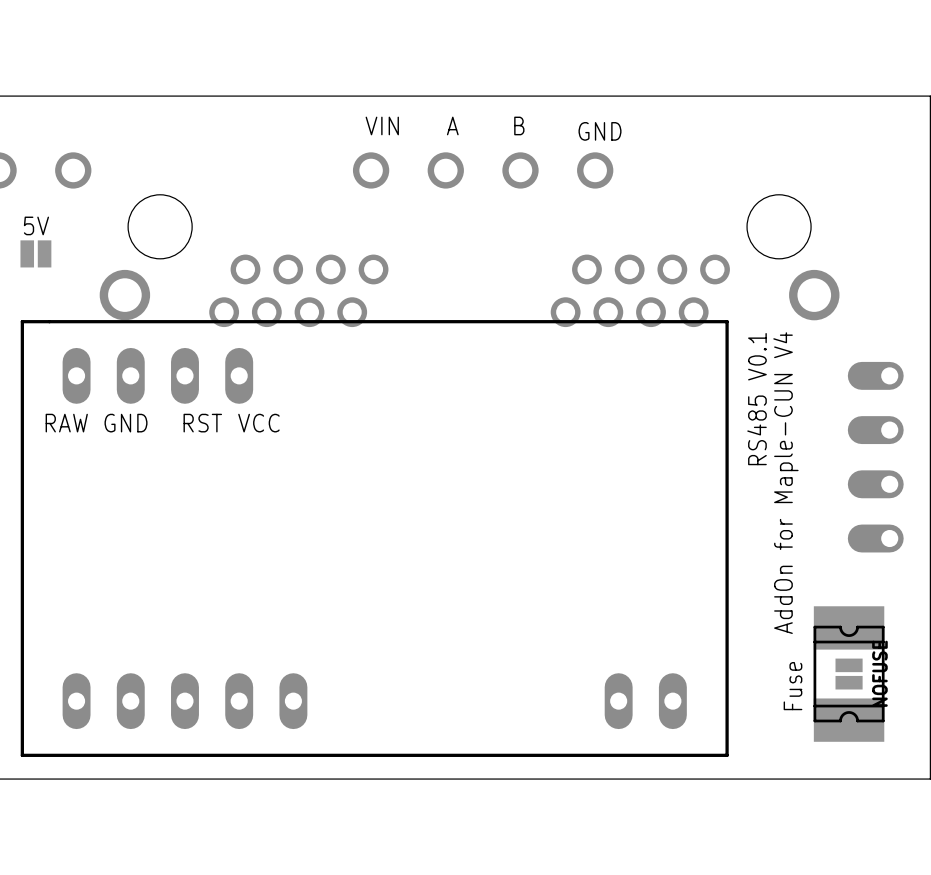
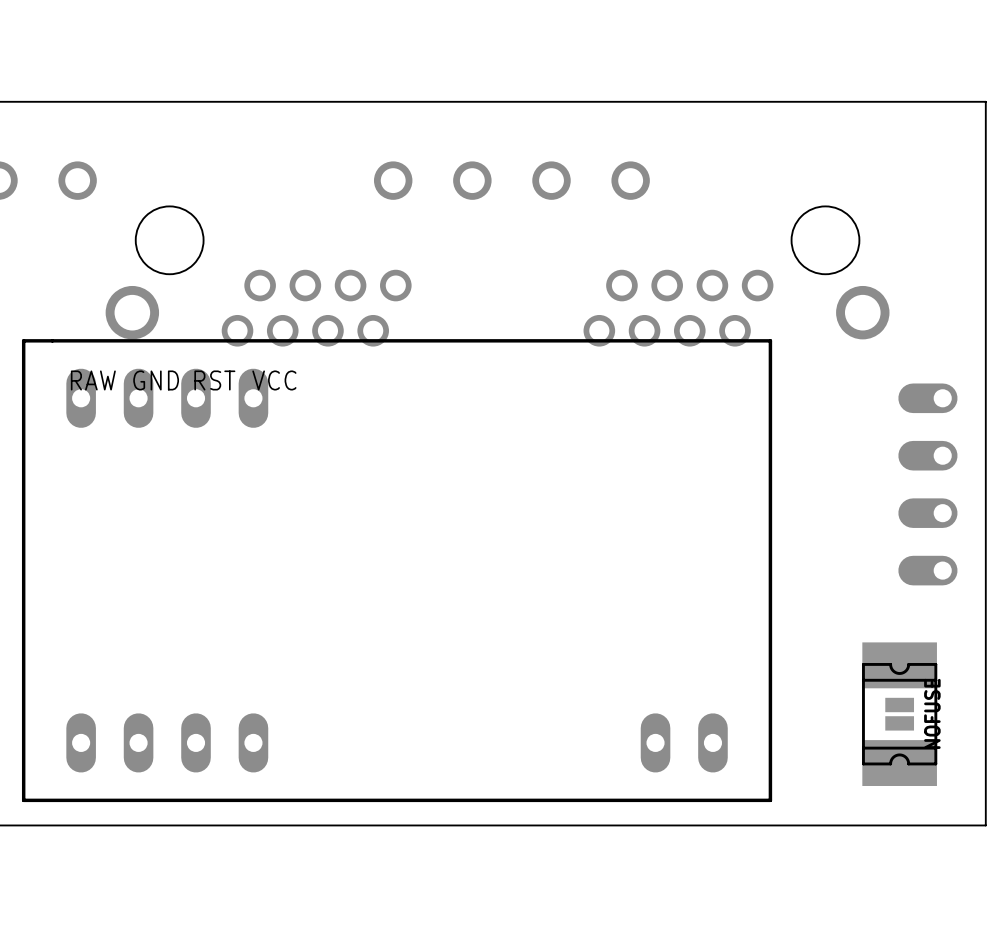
text: VIN (382, 125) -> none
text: A (452, 125) -> none
text: B (519, 125) -> none
text: GND (600, 131) -> none
text: 5V (36, 225) -> none
part: (35, 253) -> none
part footprint: [20, 320, 729, 757] -> [21, 339, 773, 803]
text: RS485 V0.1 (757, 399) -> none
text position: RAW (66, 423) -> RAW (93, 380)
text position: GND (126, 423) -> GND (156, 380)
text position: RST (202, 423) -> RST (214, 380)
text position: VCC (258, 423) -> VCC (274, 380)
text: AddOn for Maple-CUN V4 (785, 483) -> none
text: Fuse (793, 686) -> none

